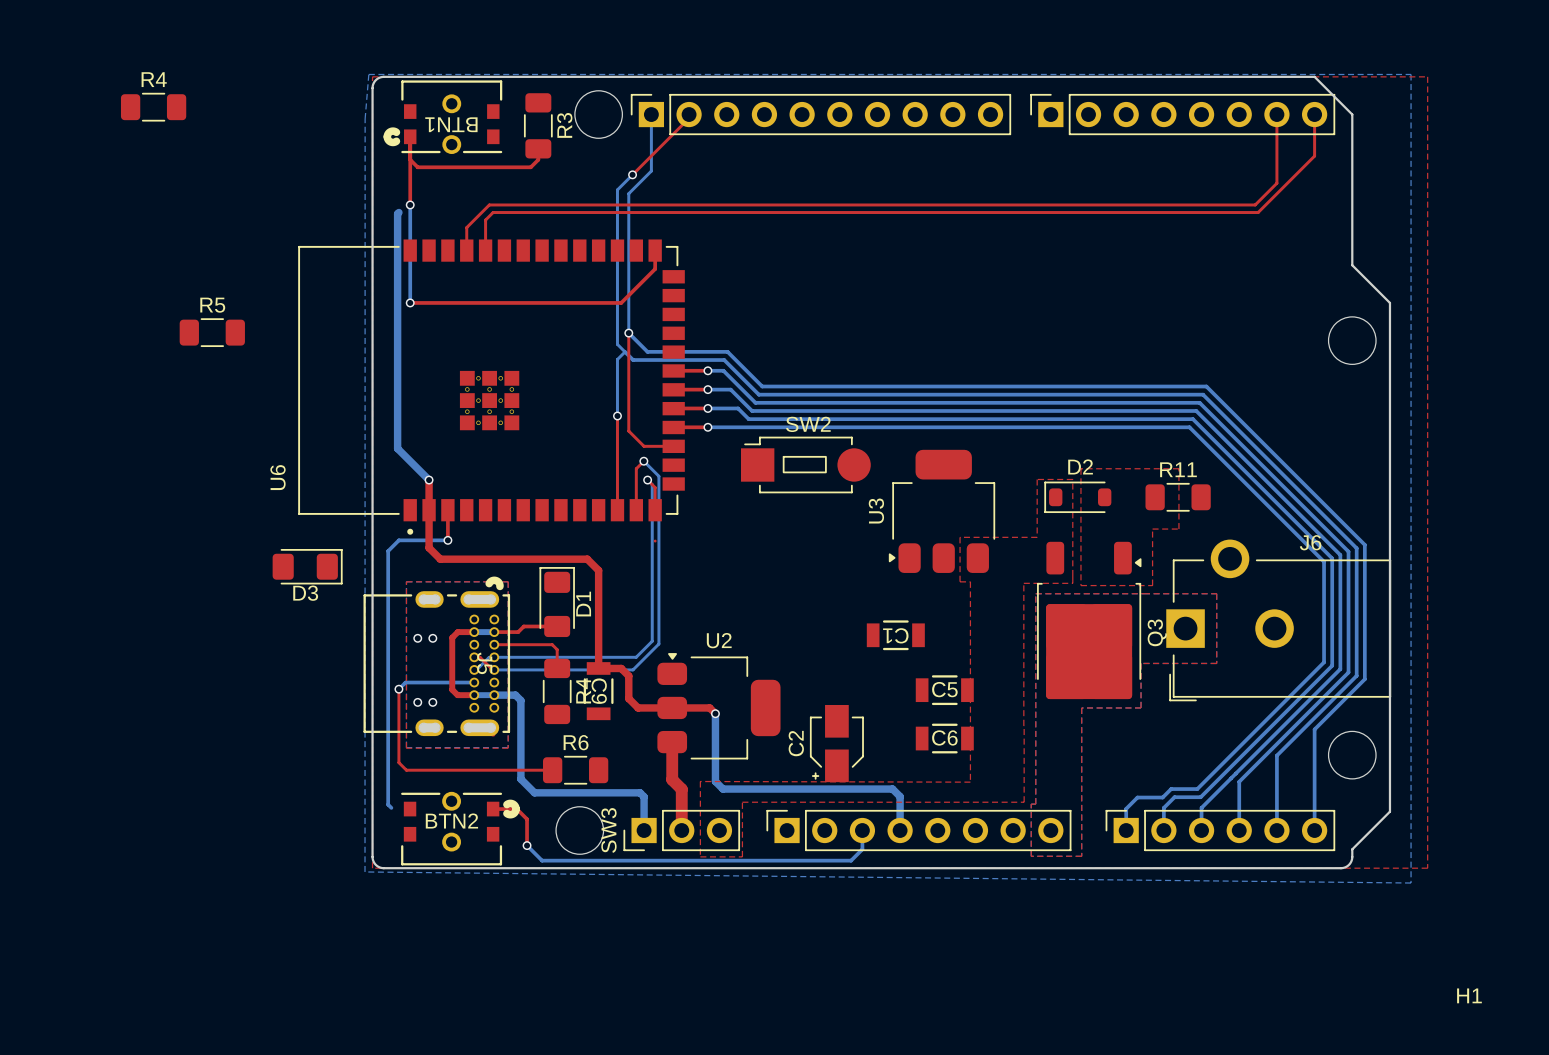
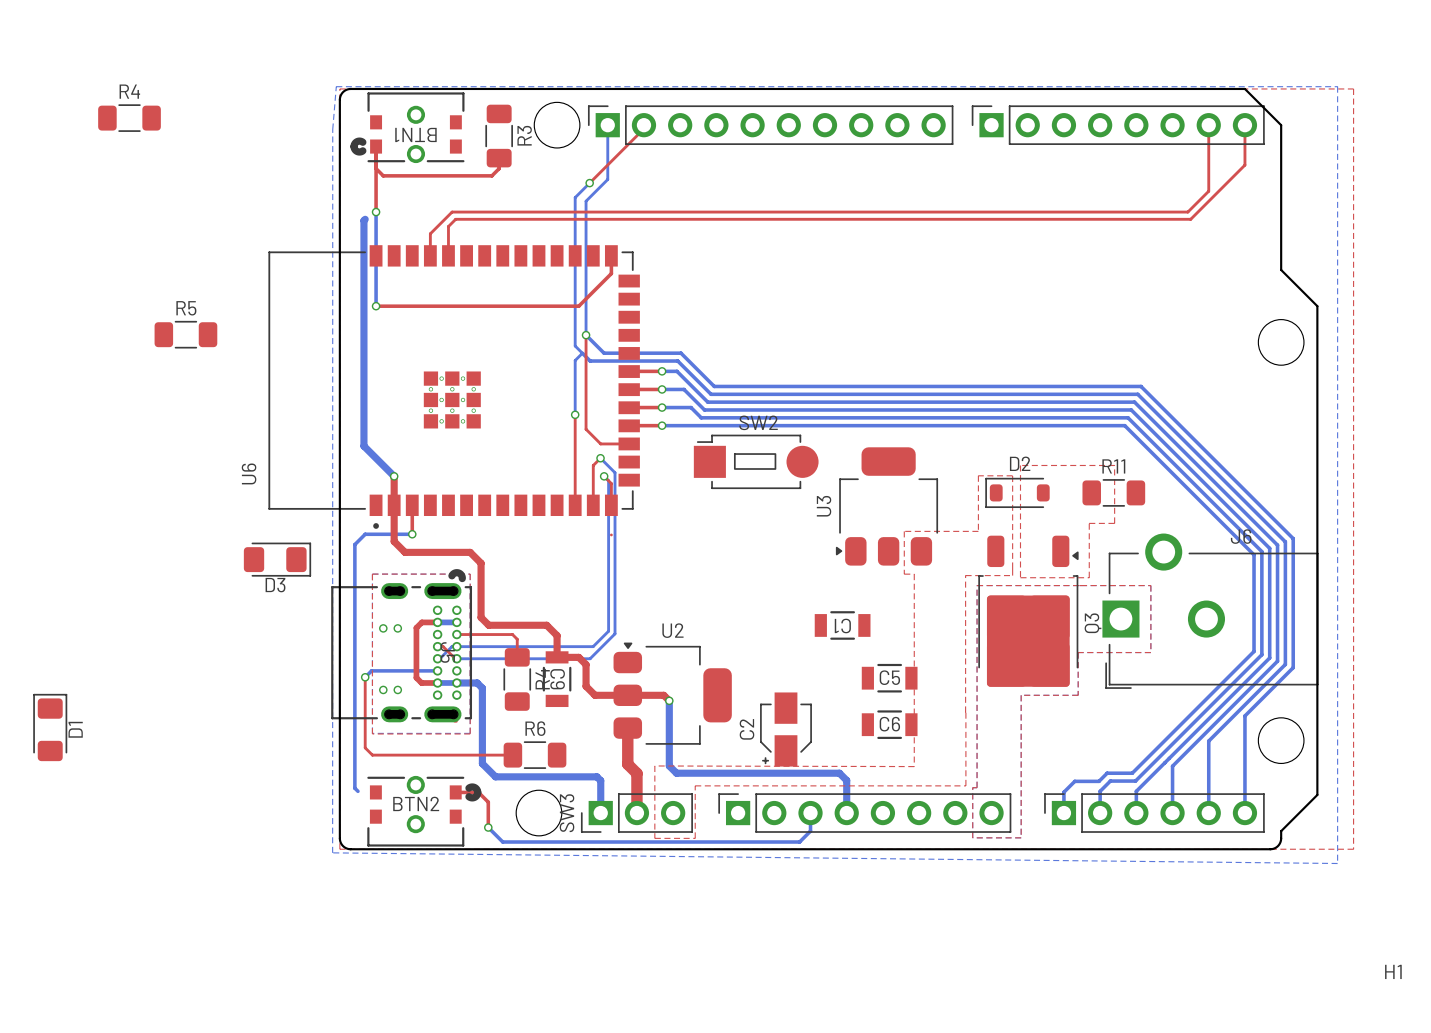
top track: (508, 559) (587, 559) (598, 570) (598, 645) -> (470, 552) (481, 563) (481, 617) (488, 625) (546, 625) (557, 635)
D1 position: (557, 602) -> (50, 727)
top track: (557, 626) (523, 626) (518, 632) (494, 632) -> none

